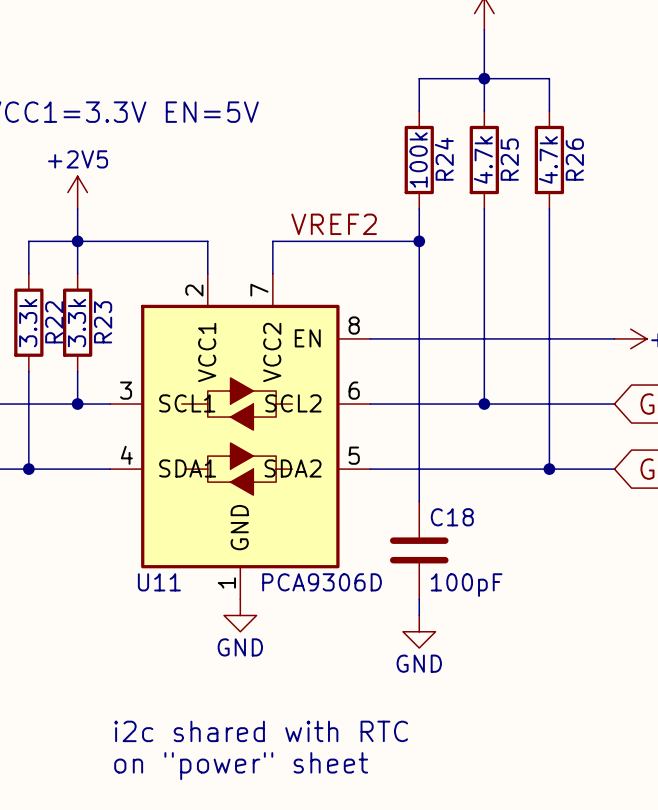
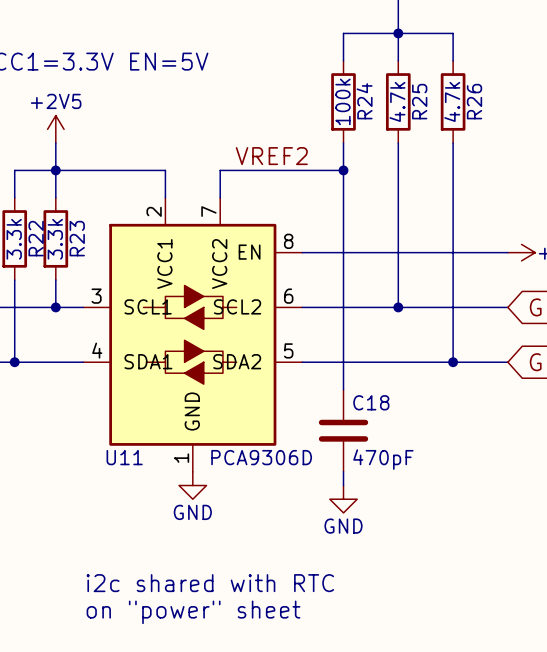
C18 value: 100pF (466, 585) -> 470pF (383, 459)

